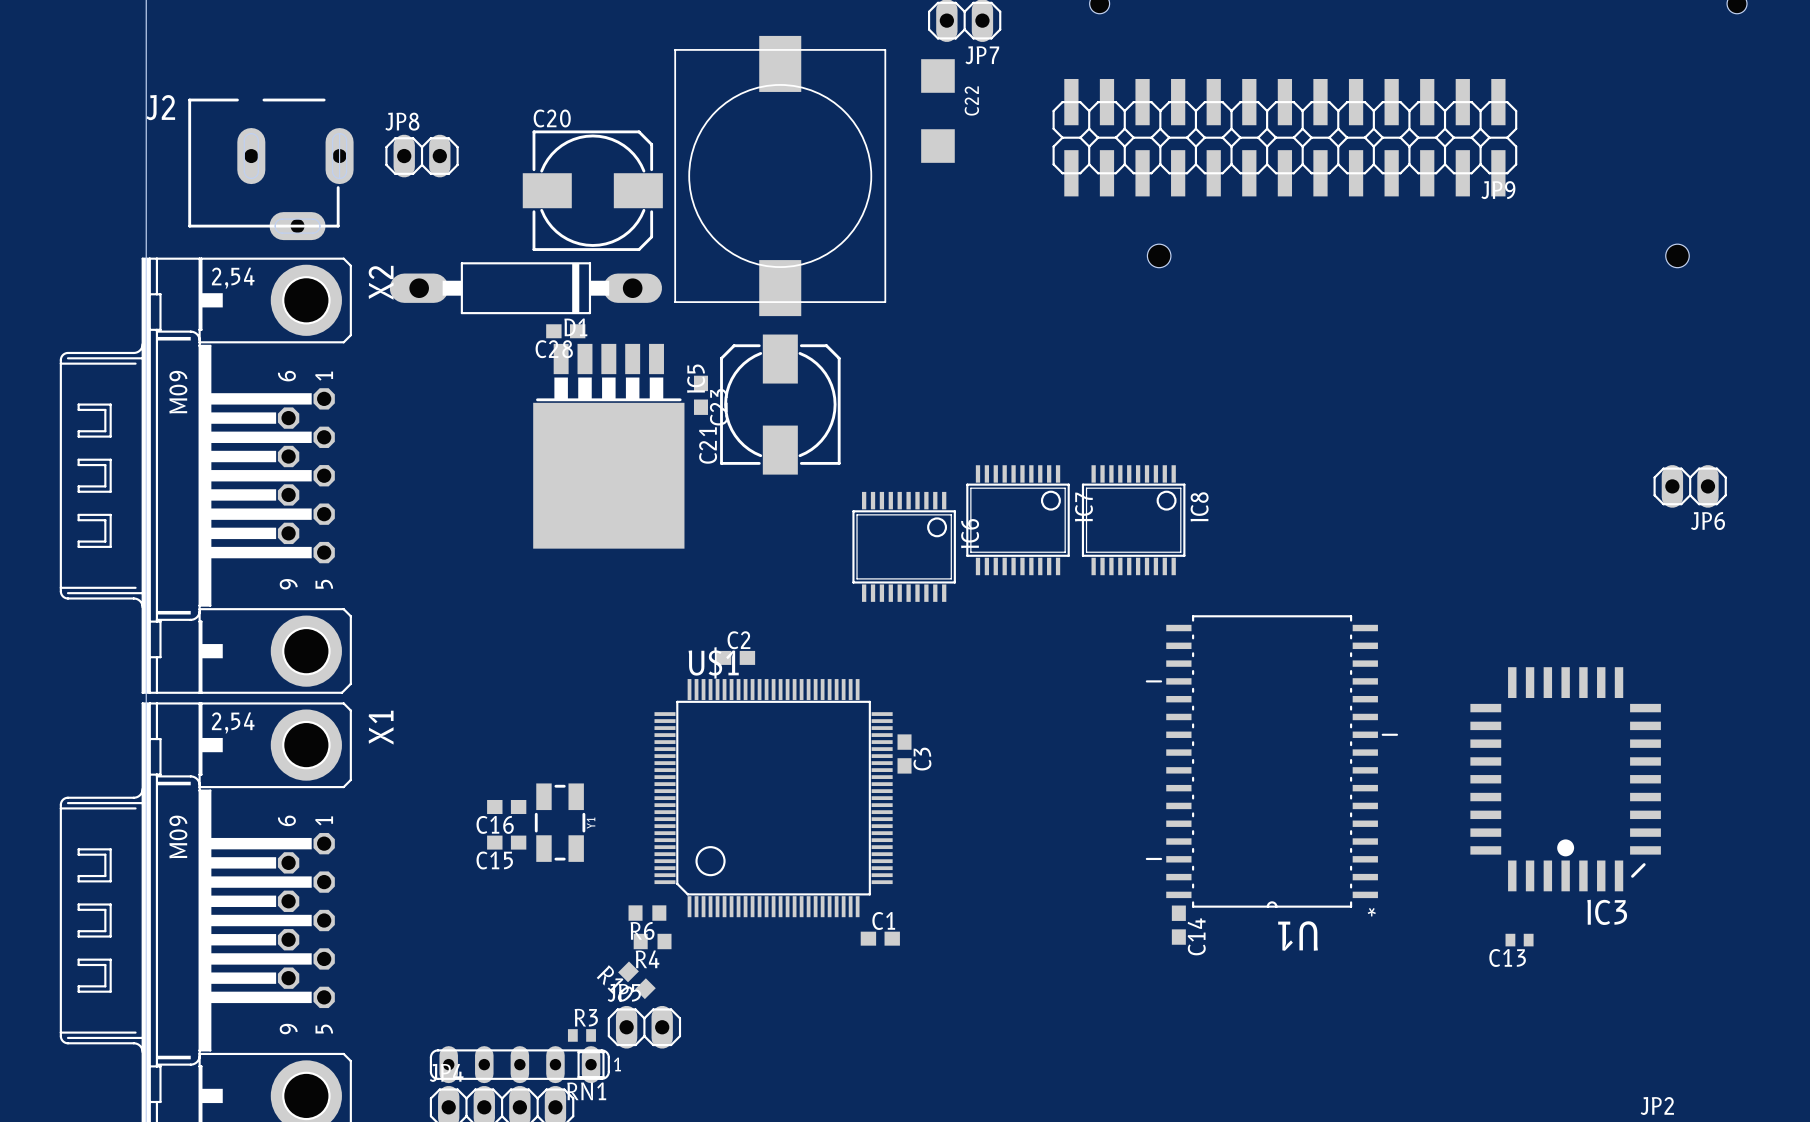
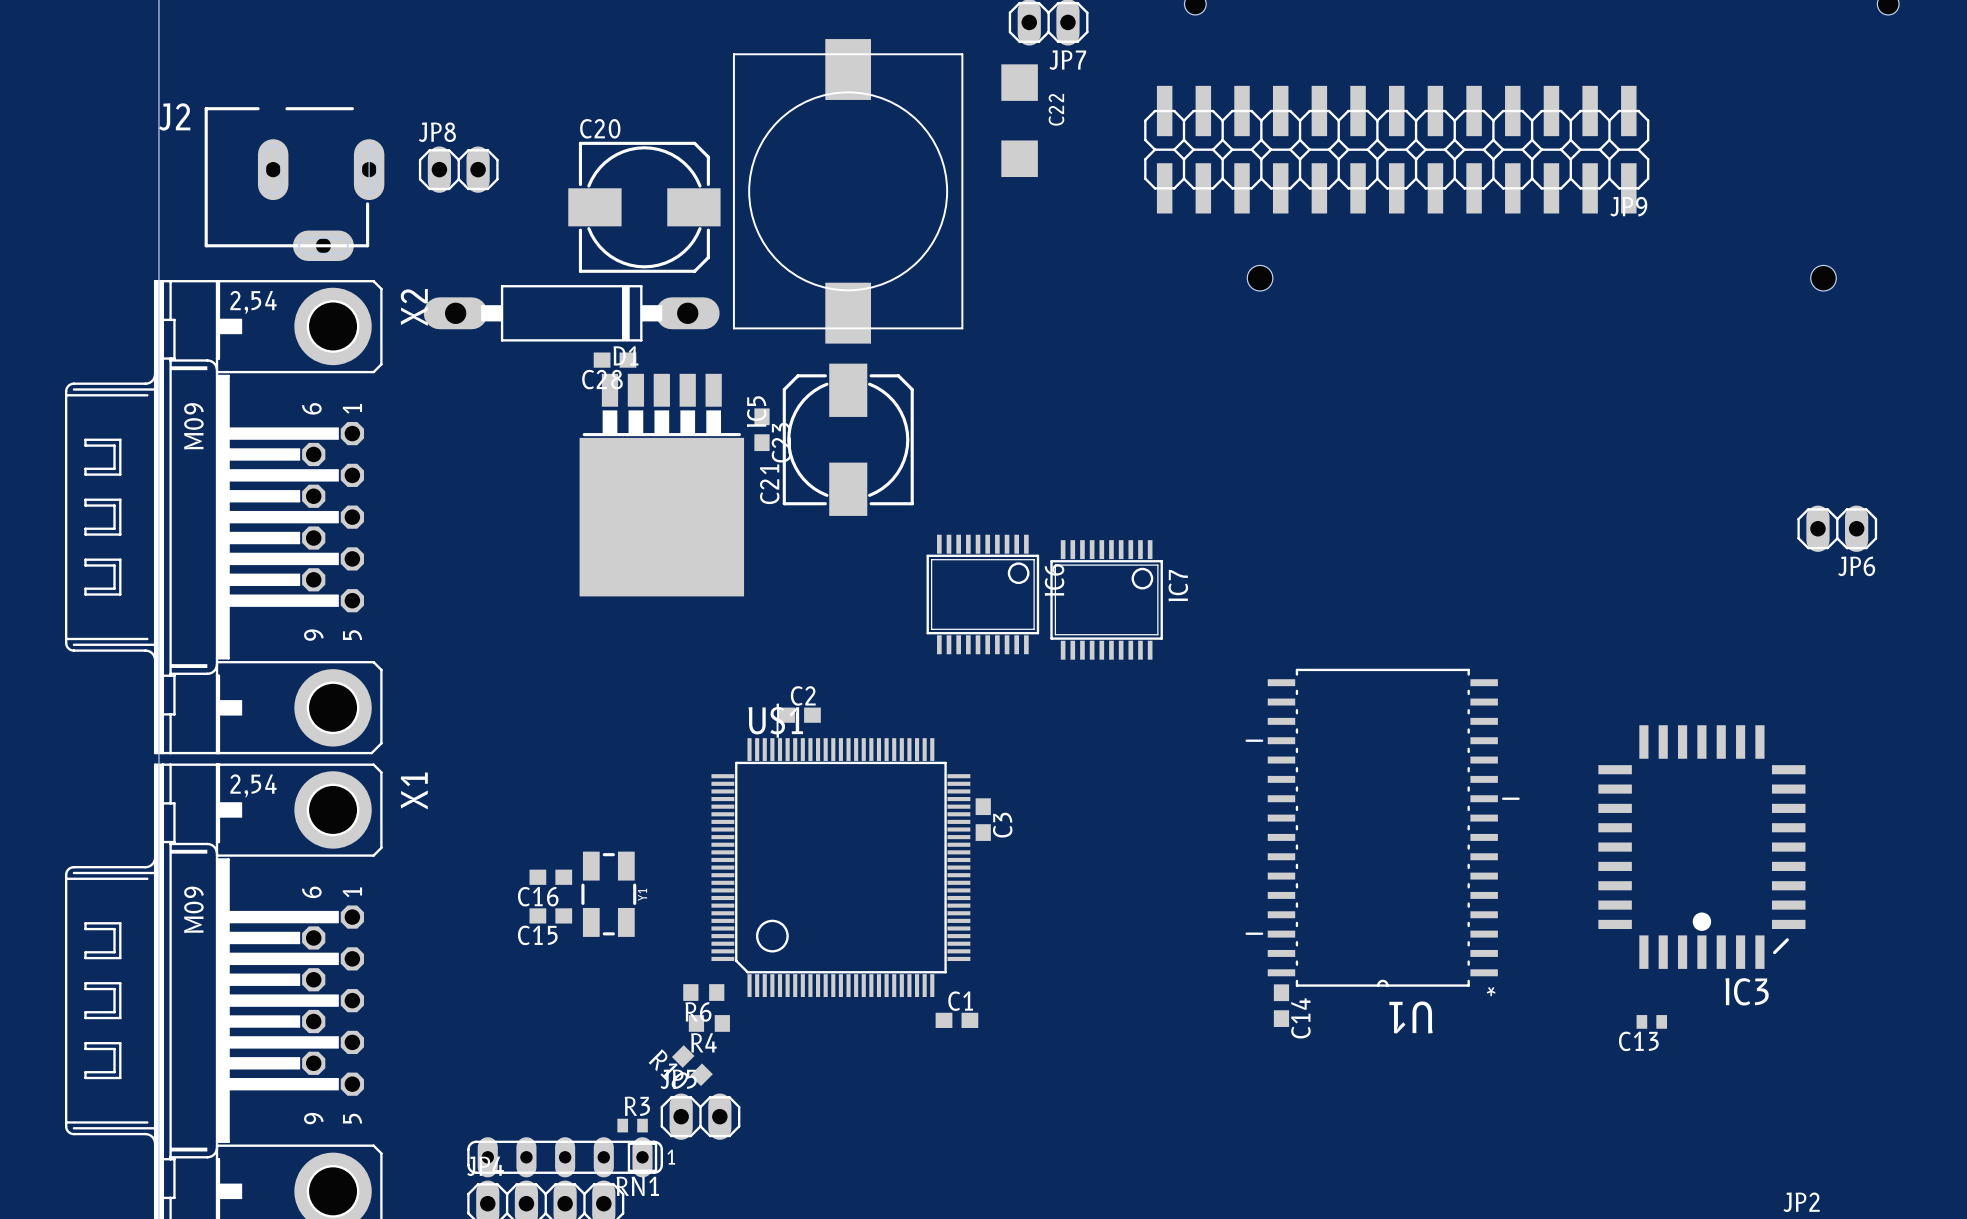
IC7 position: (1018, 520) -> (1106, 599)
IC8: (1133, 520) -> none

